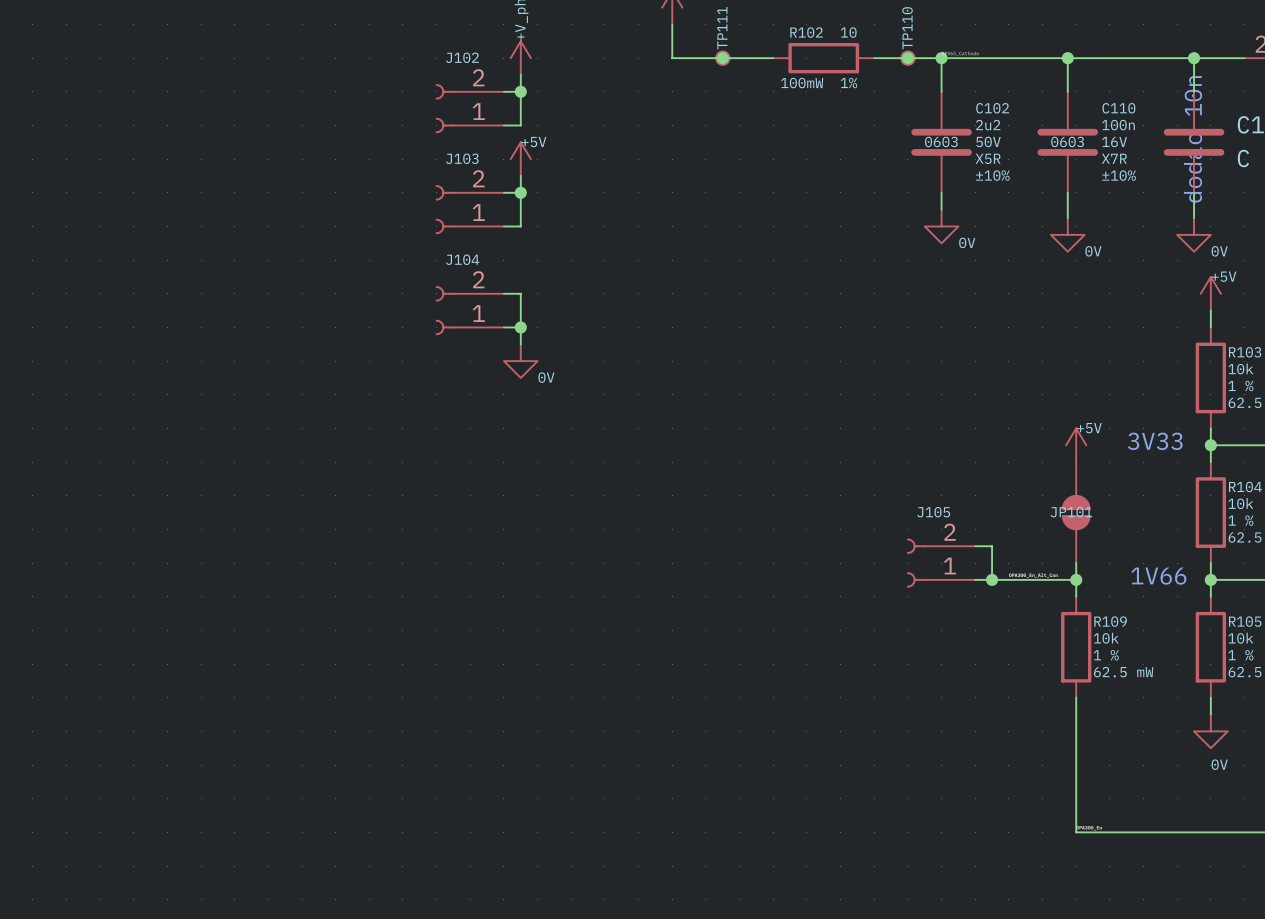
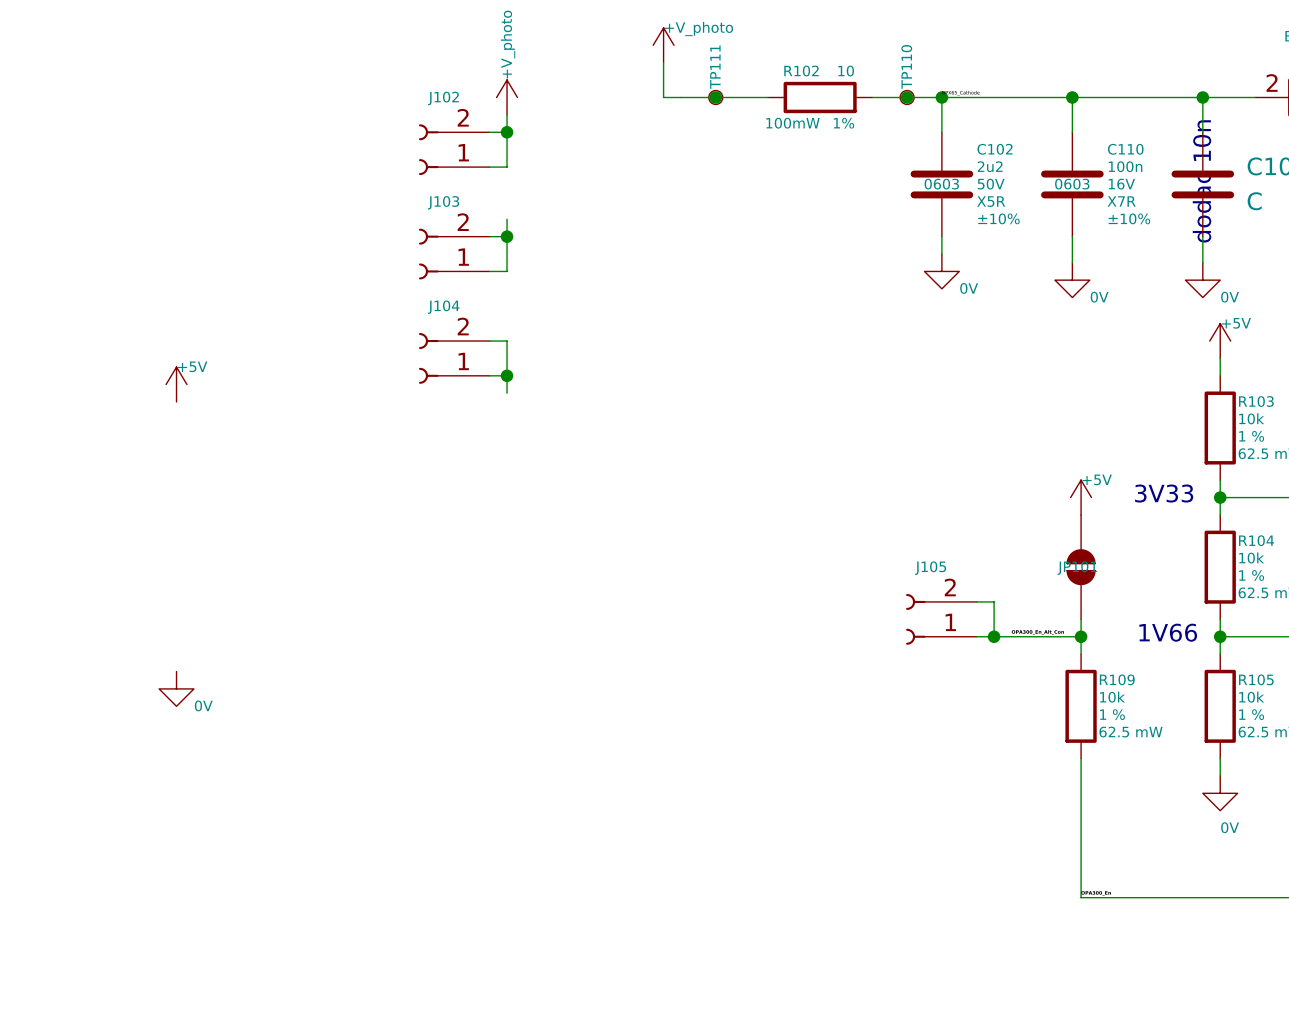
power symbol: +5V (520, 159) -> none
power symbol: none -> +5V (176, 384)
power symbol: 0V (520, 361) -> none
power symbol: none -> 0V (176, 688)

